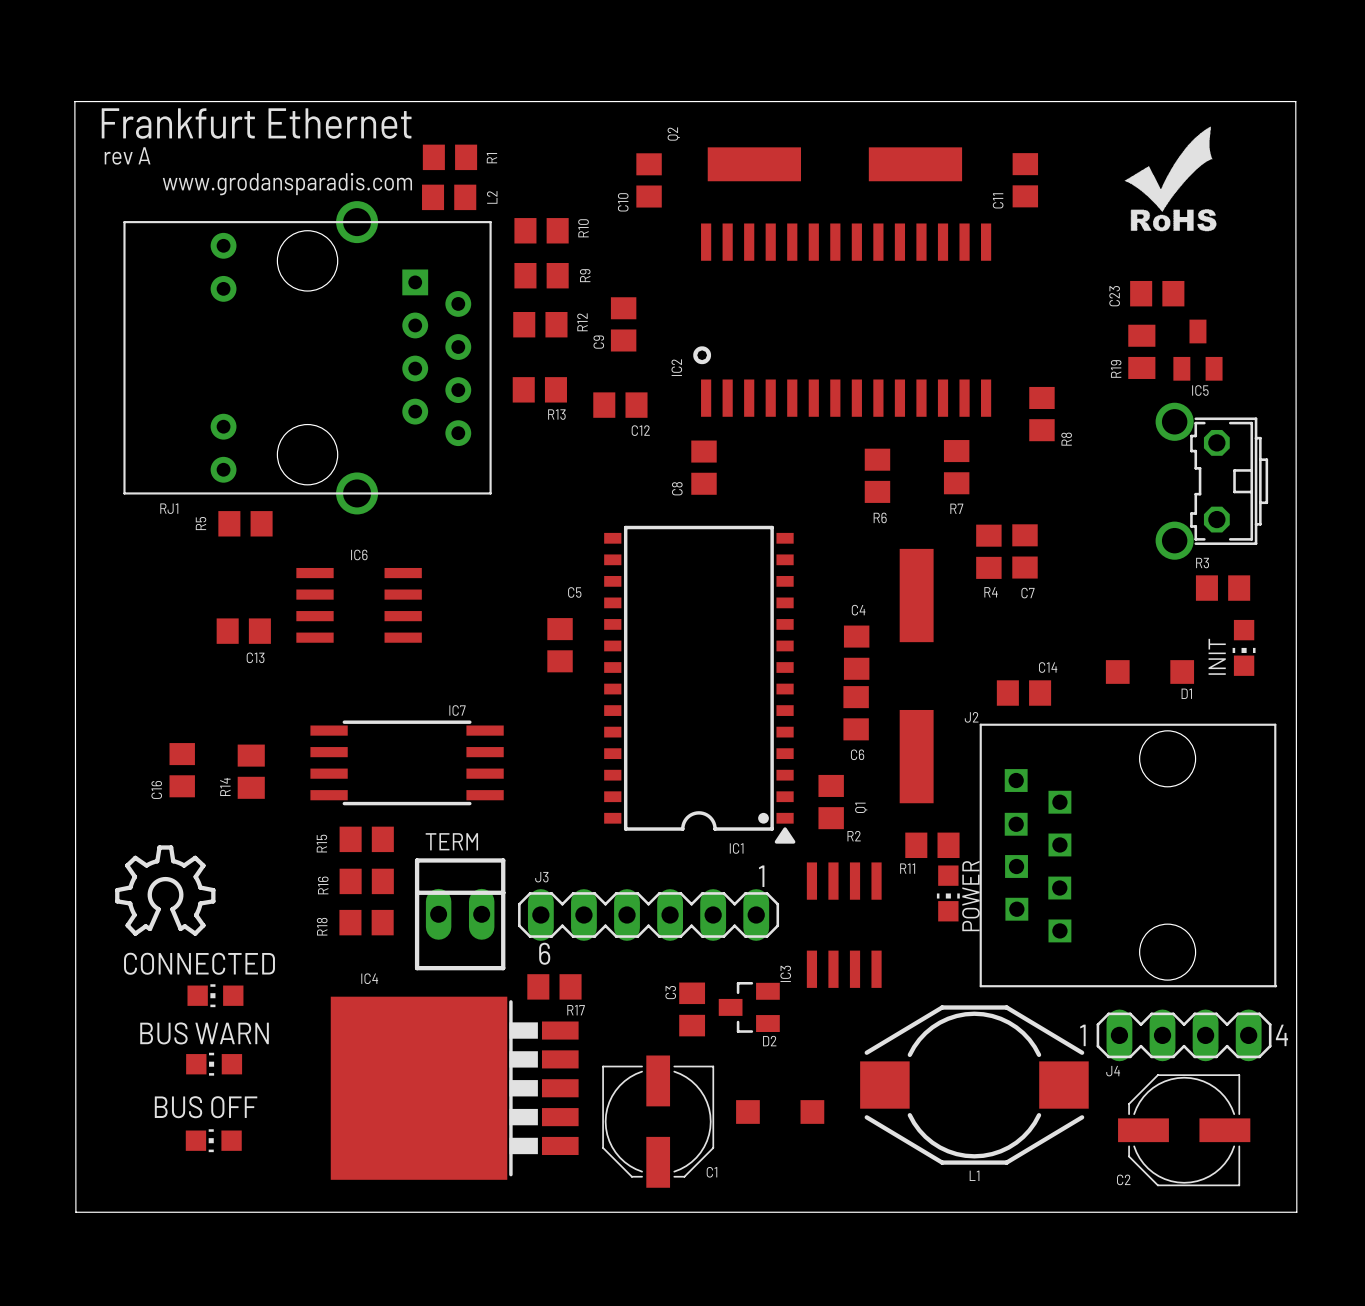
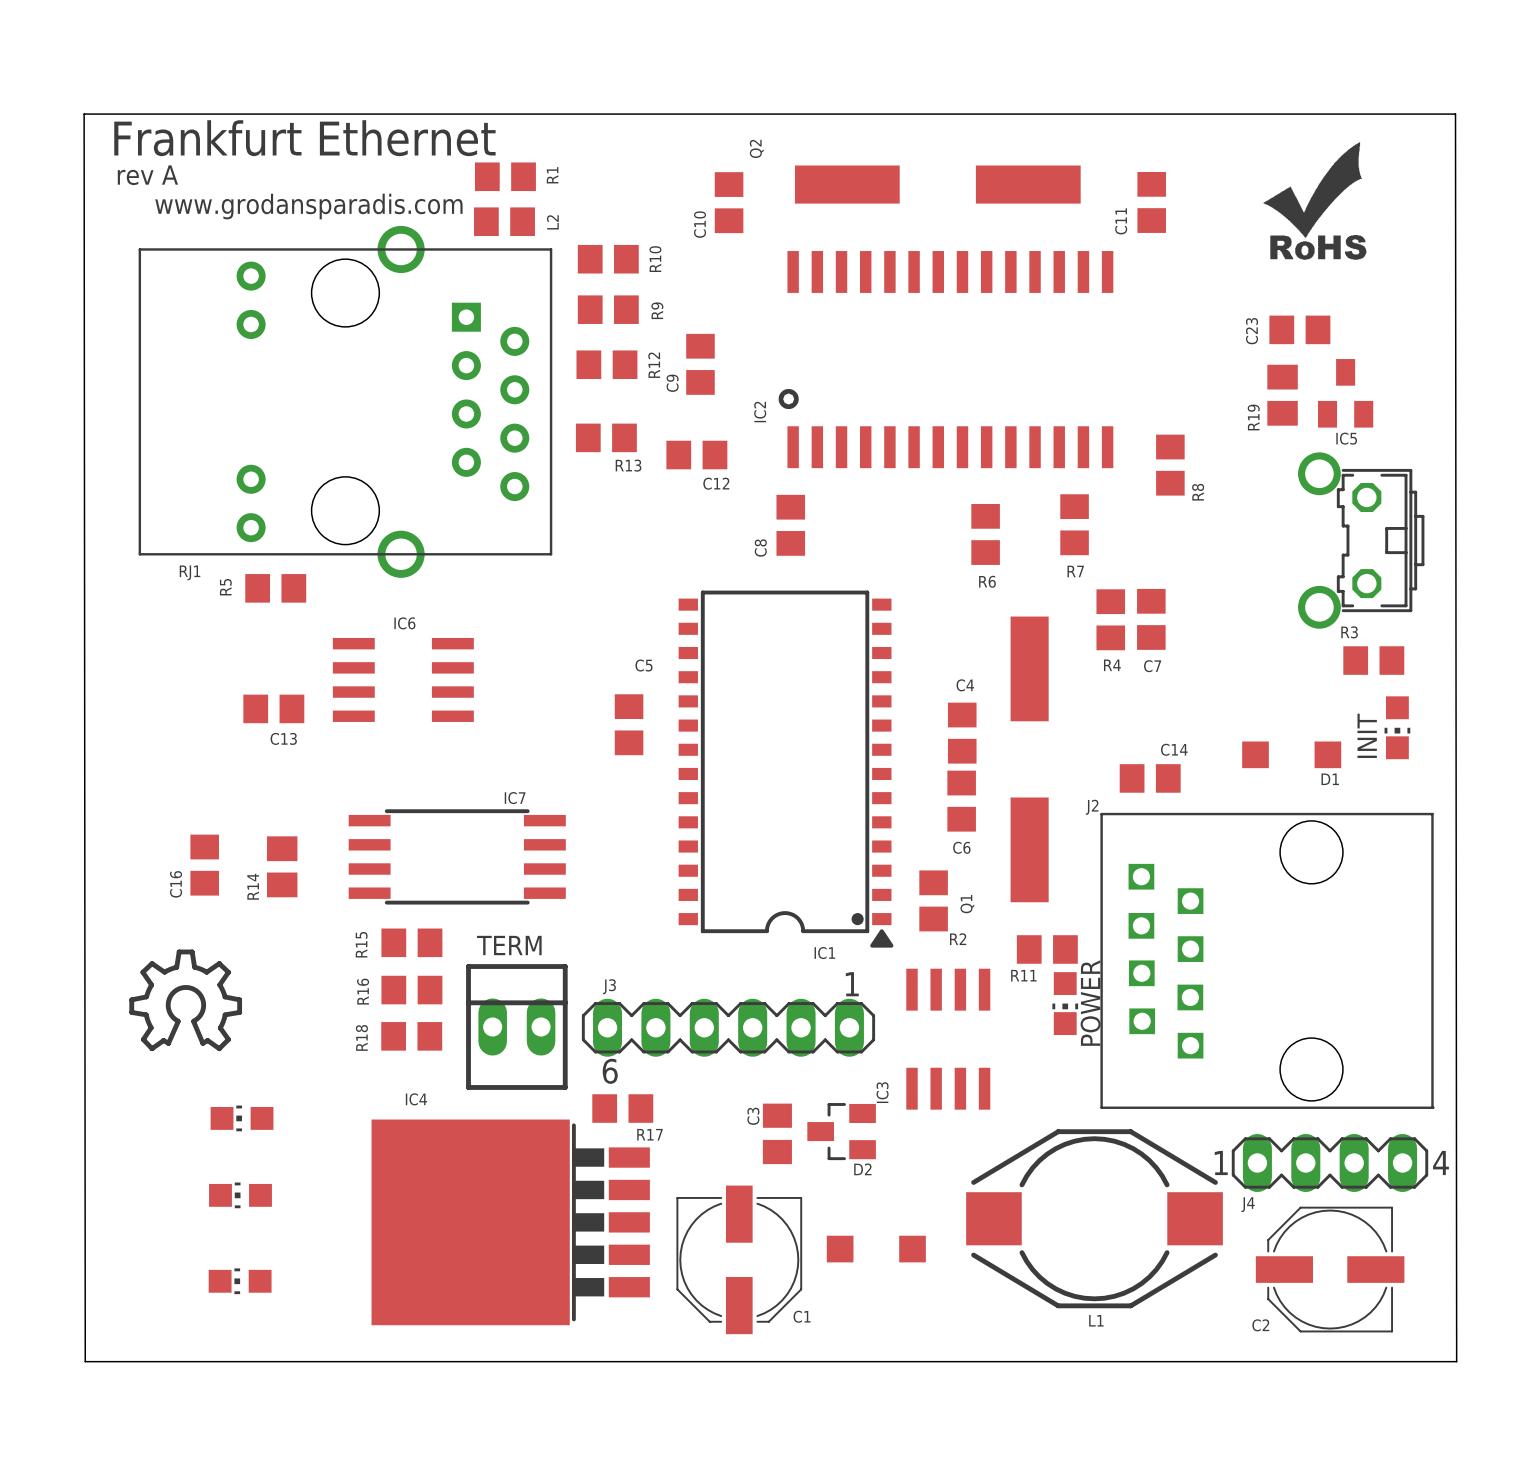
text: CONNECTED (199, 963) -> none
text: BUS WARN (204, 1033) -> none
text: BUS OFF (206, 1107) -> none

